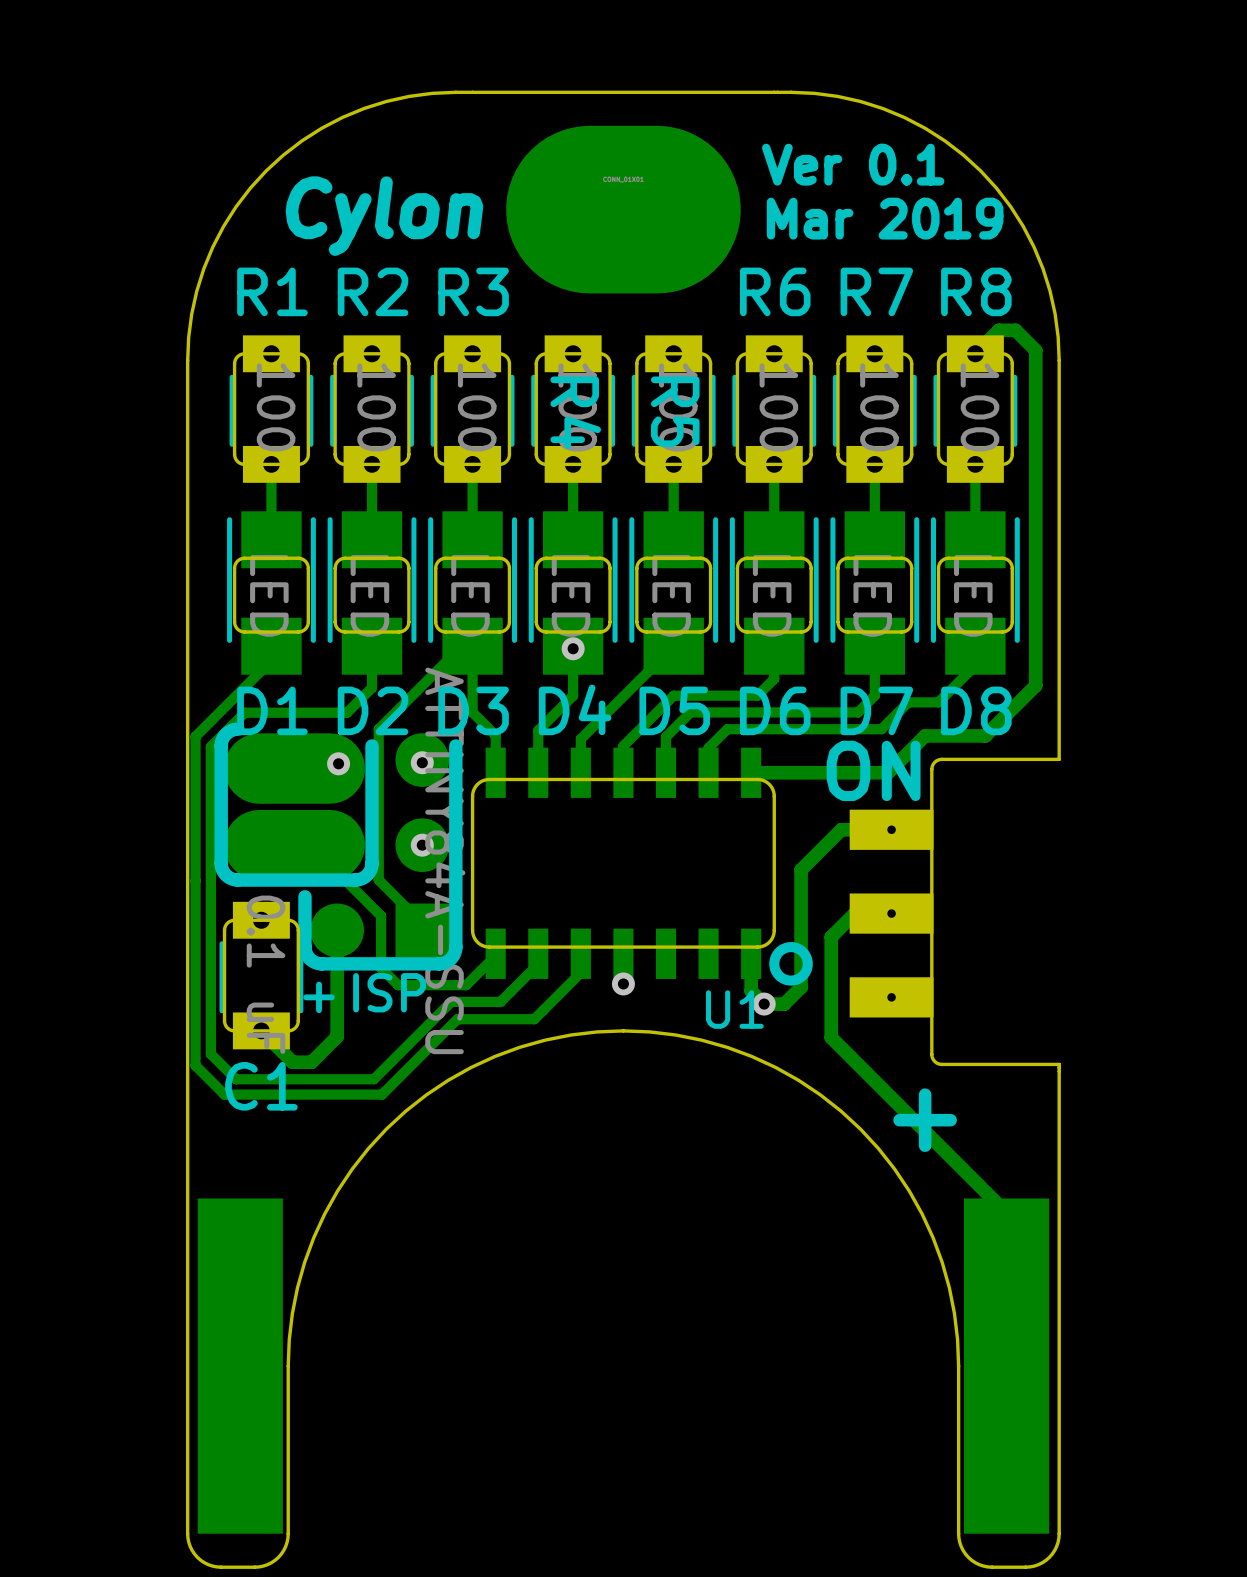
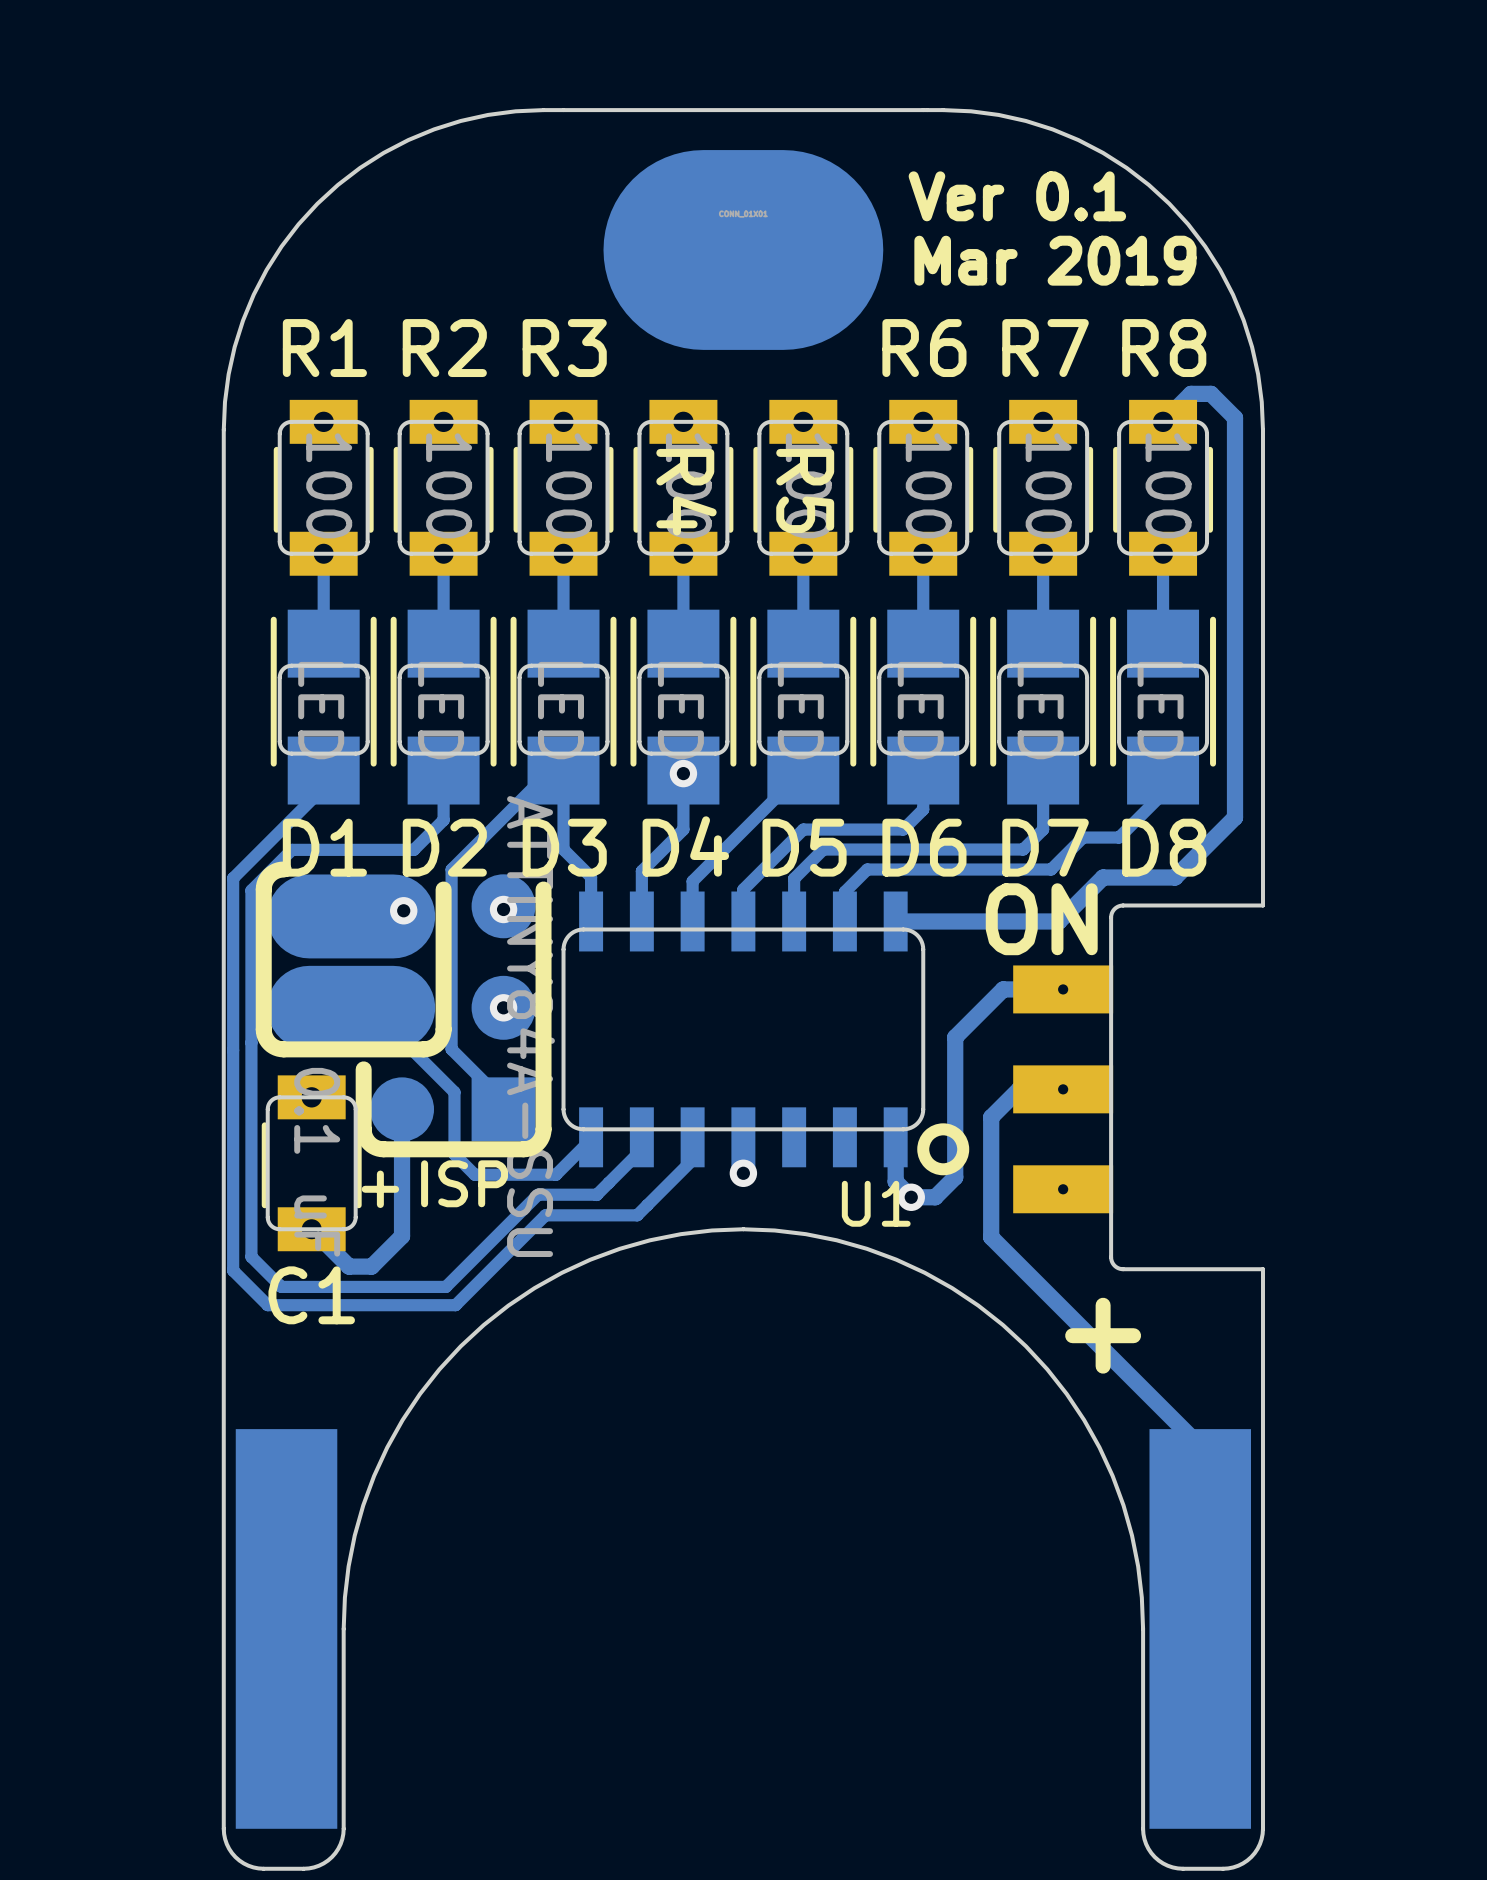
text: Cylon (384, 216) -> none

